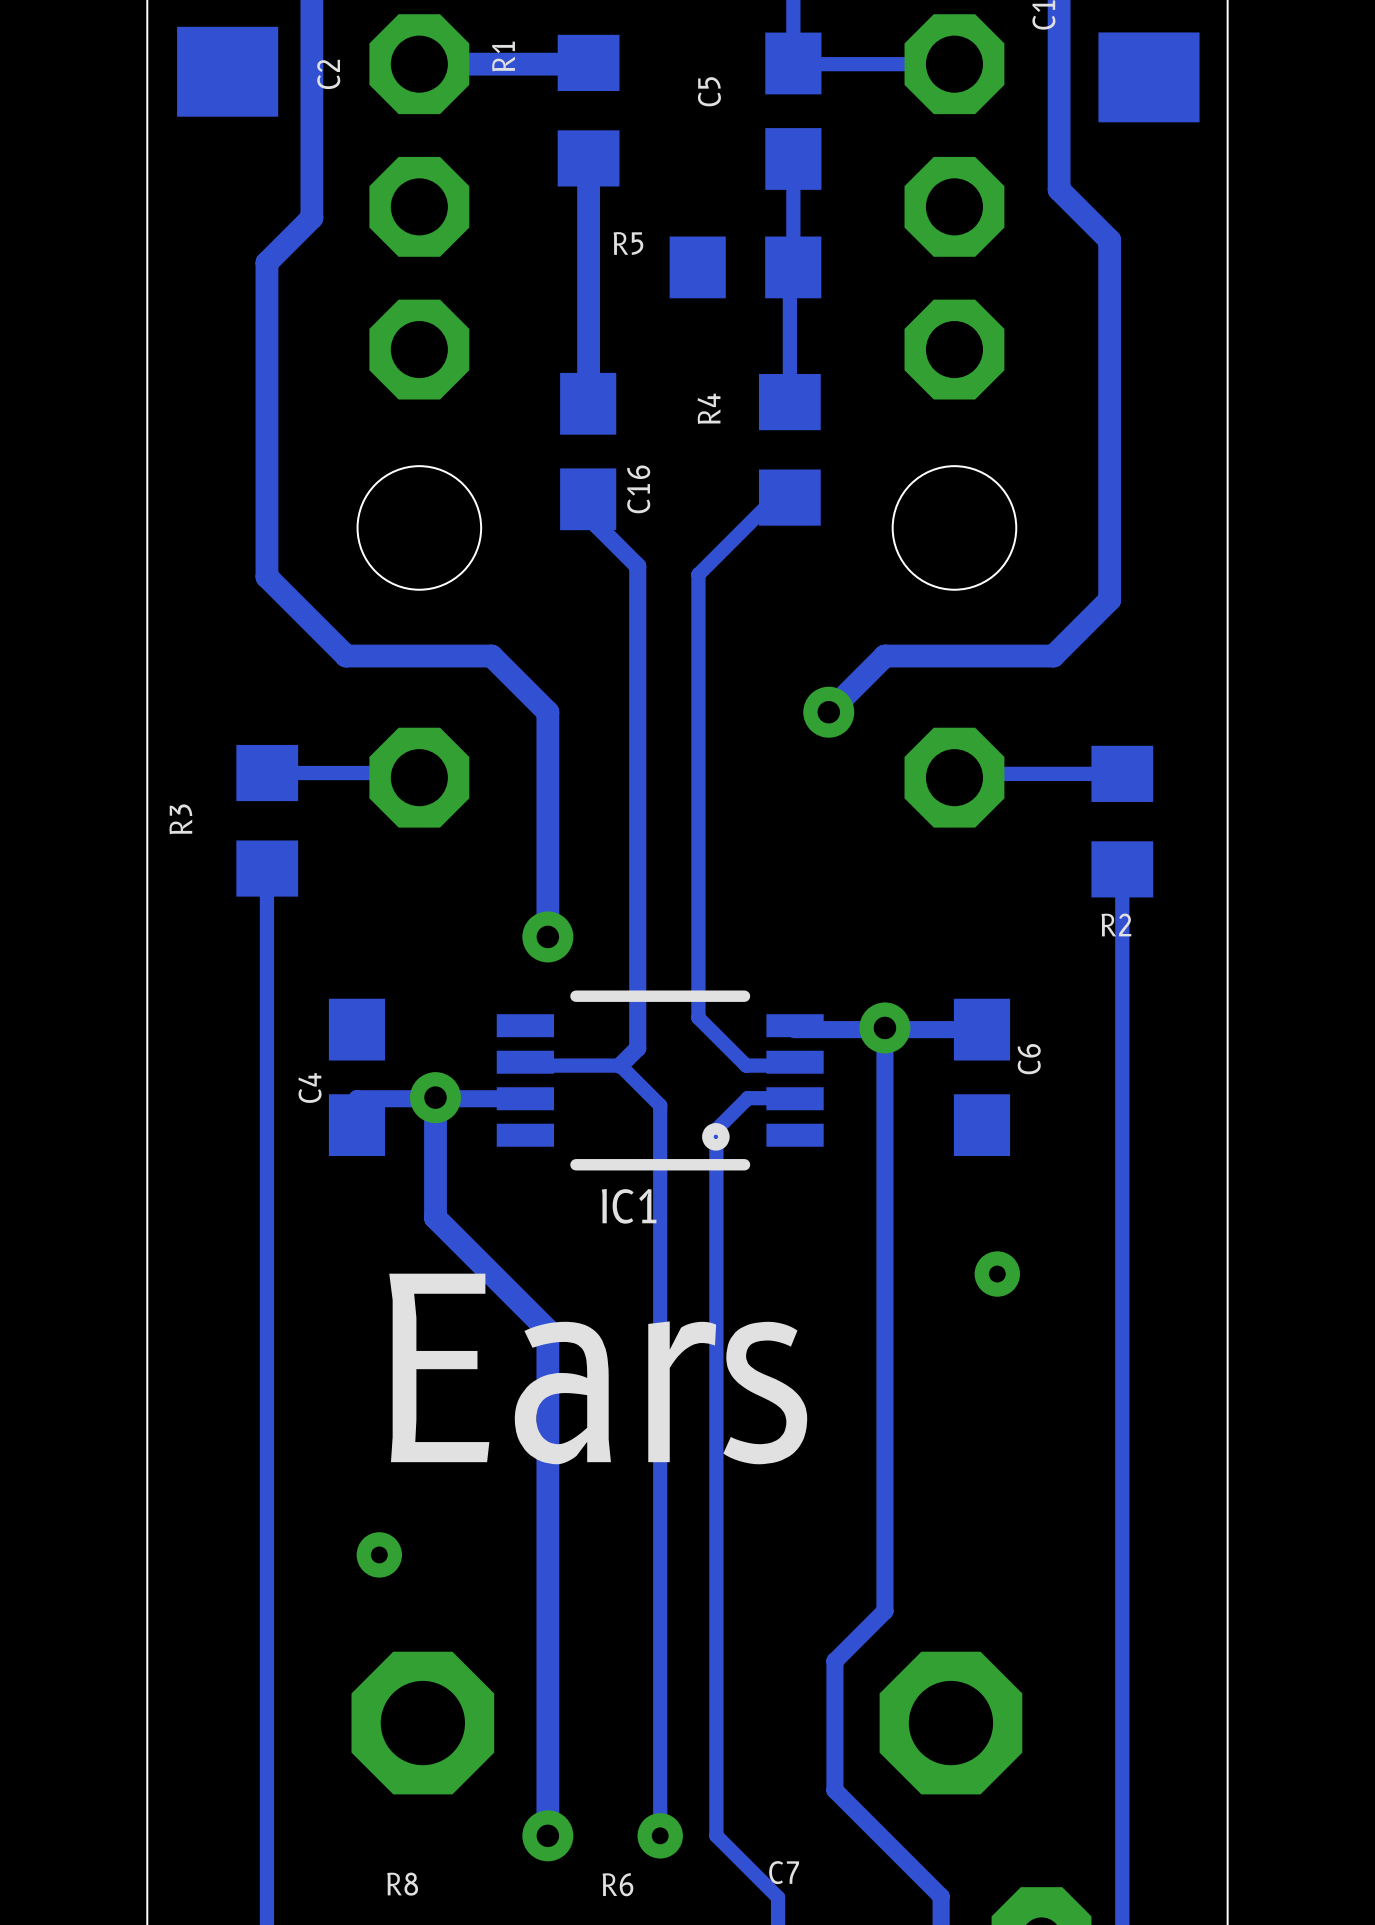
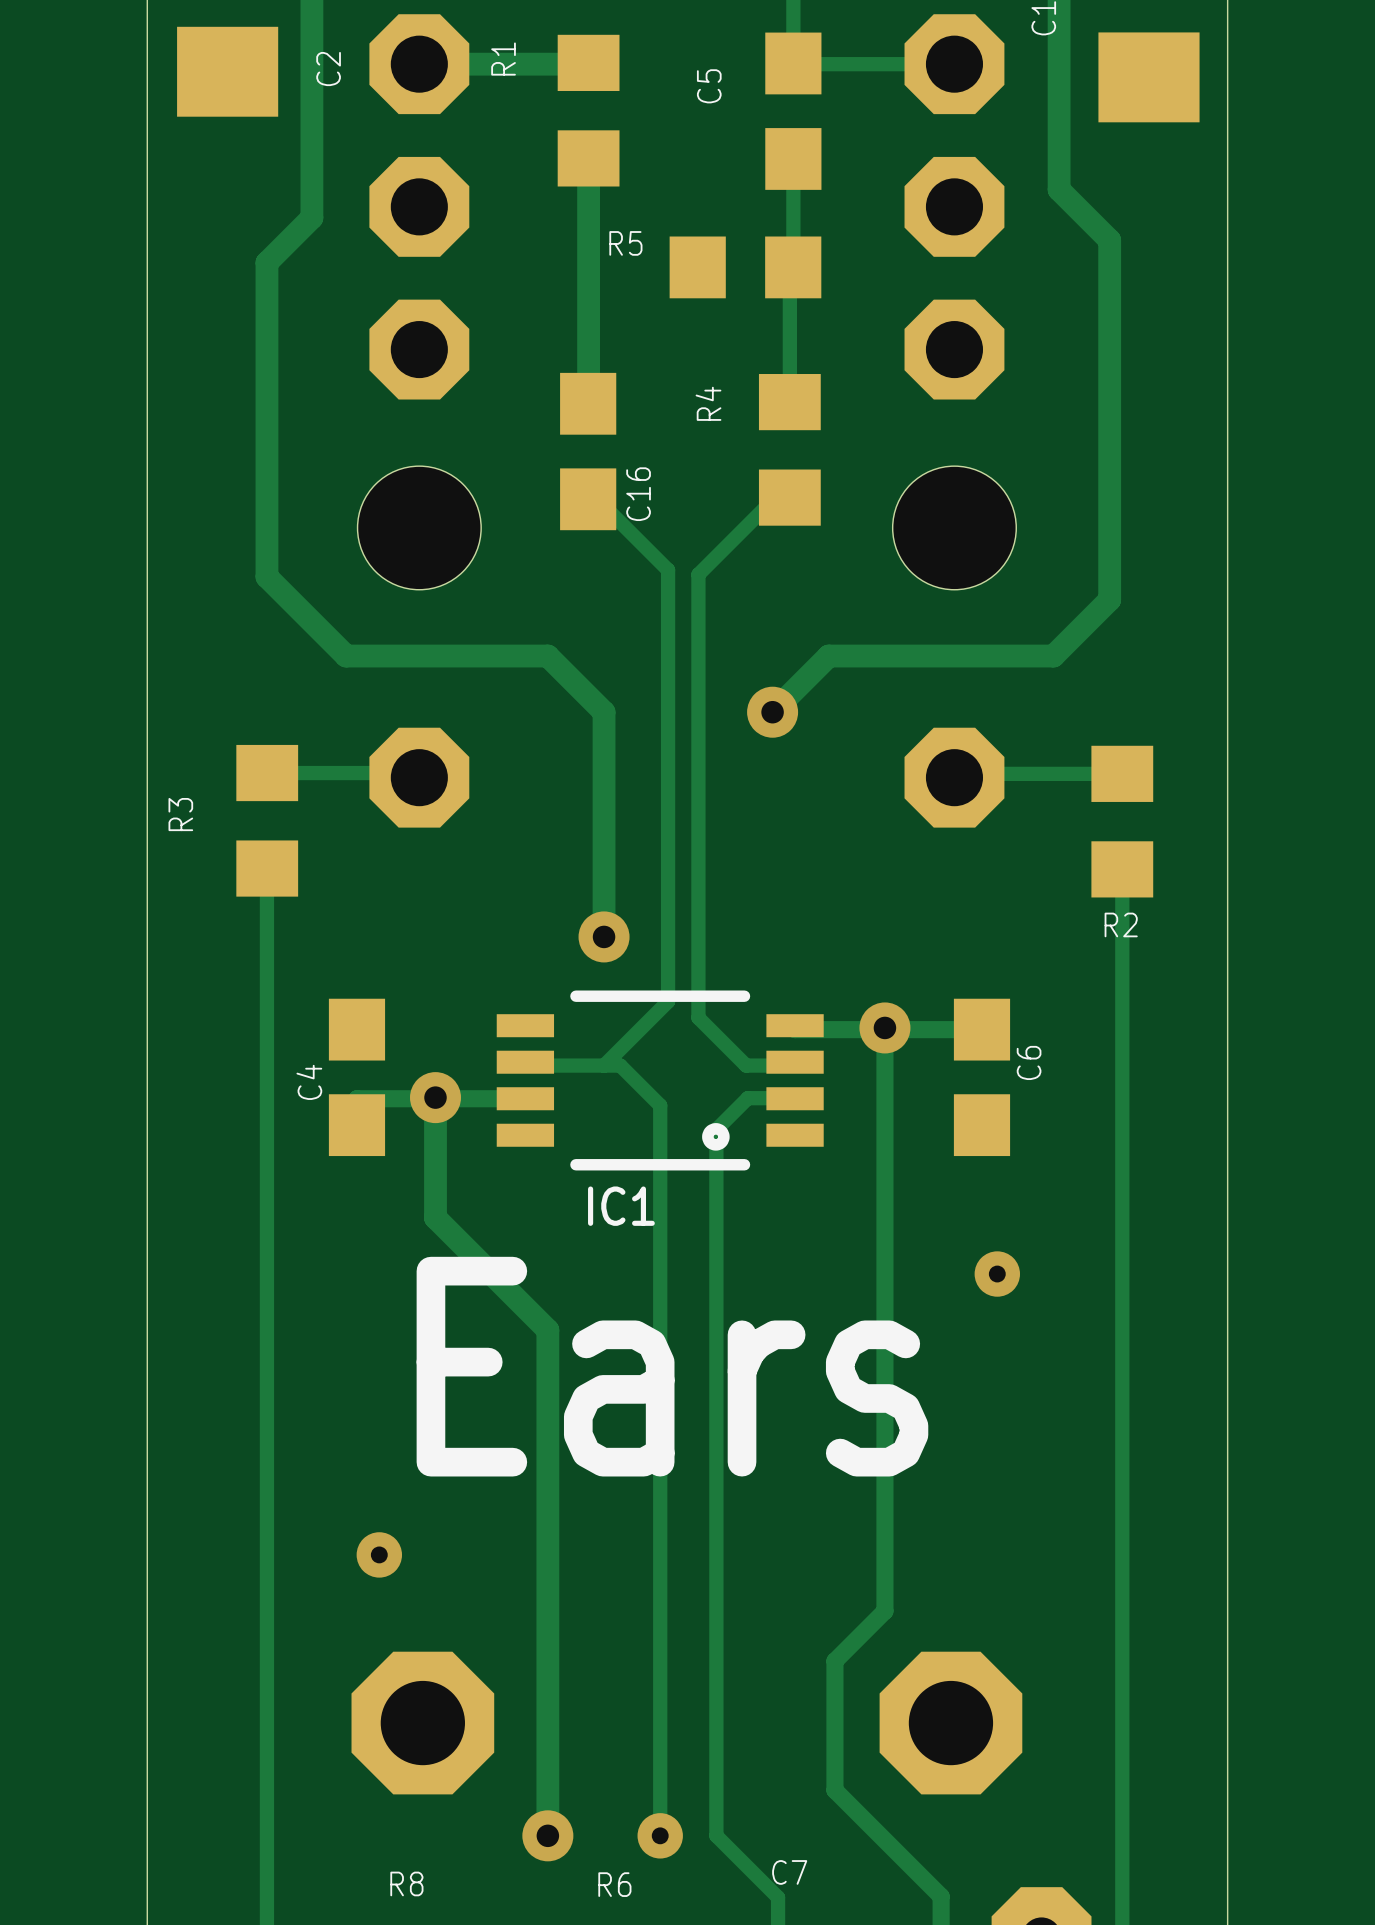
track: (597, 499) (597, 525) (637, 566) (637, 1048) (620, 1065) -> (597, 499) (668, 570) (668, 1001) (604, 1065)
track: (491, 656) (547, 712) (547, 936) -> (491, 656) (547, 656) (604, 712) (604, 936)
track: (884, 656) (828, 712) -> (884, 656) (828, 656) (772, 712)
via position: (828, 712) -> (772, 712)
via position: (547, 936) -> (604, 936)

